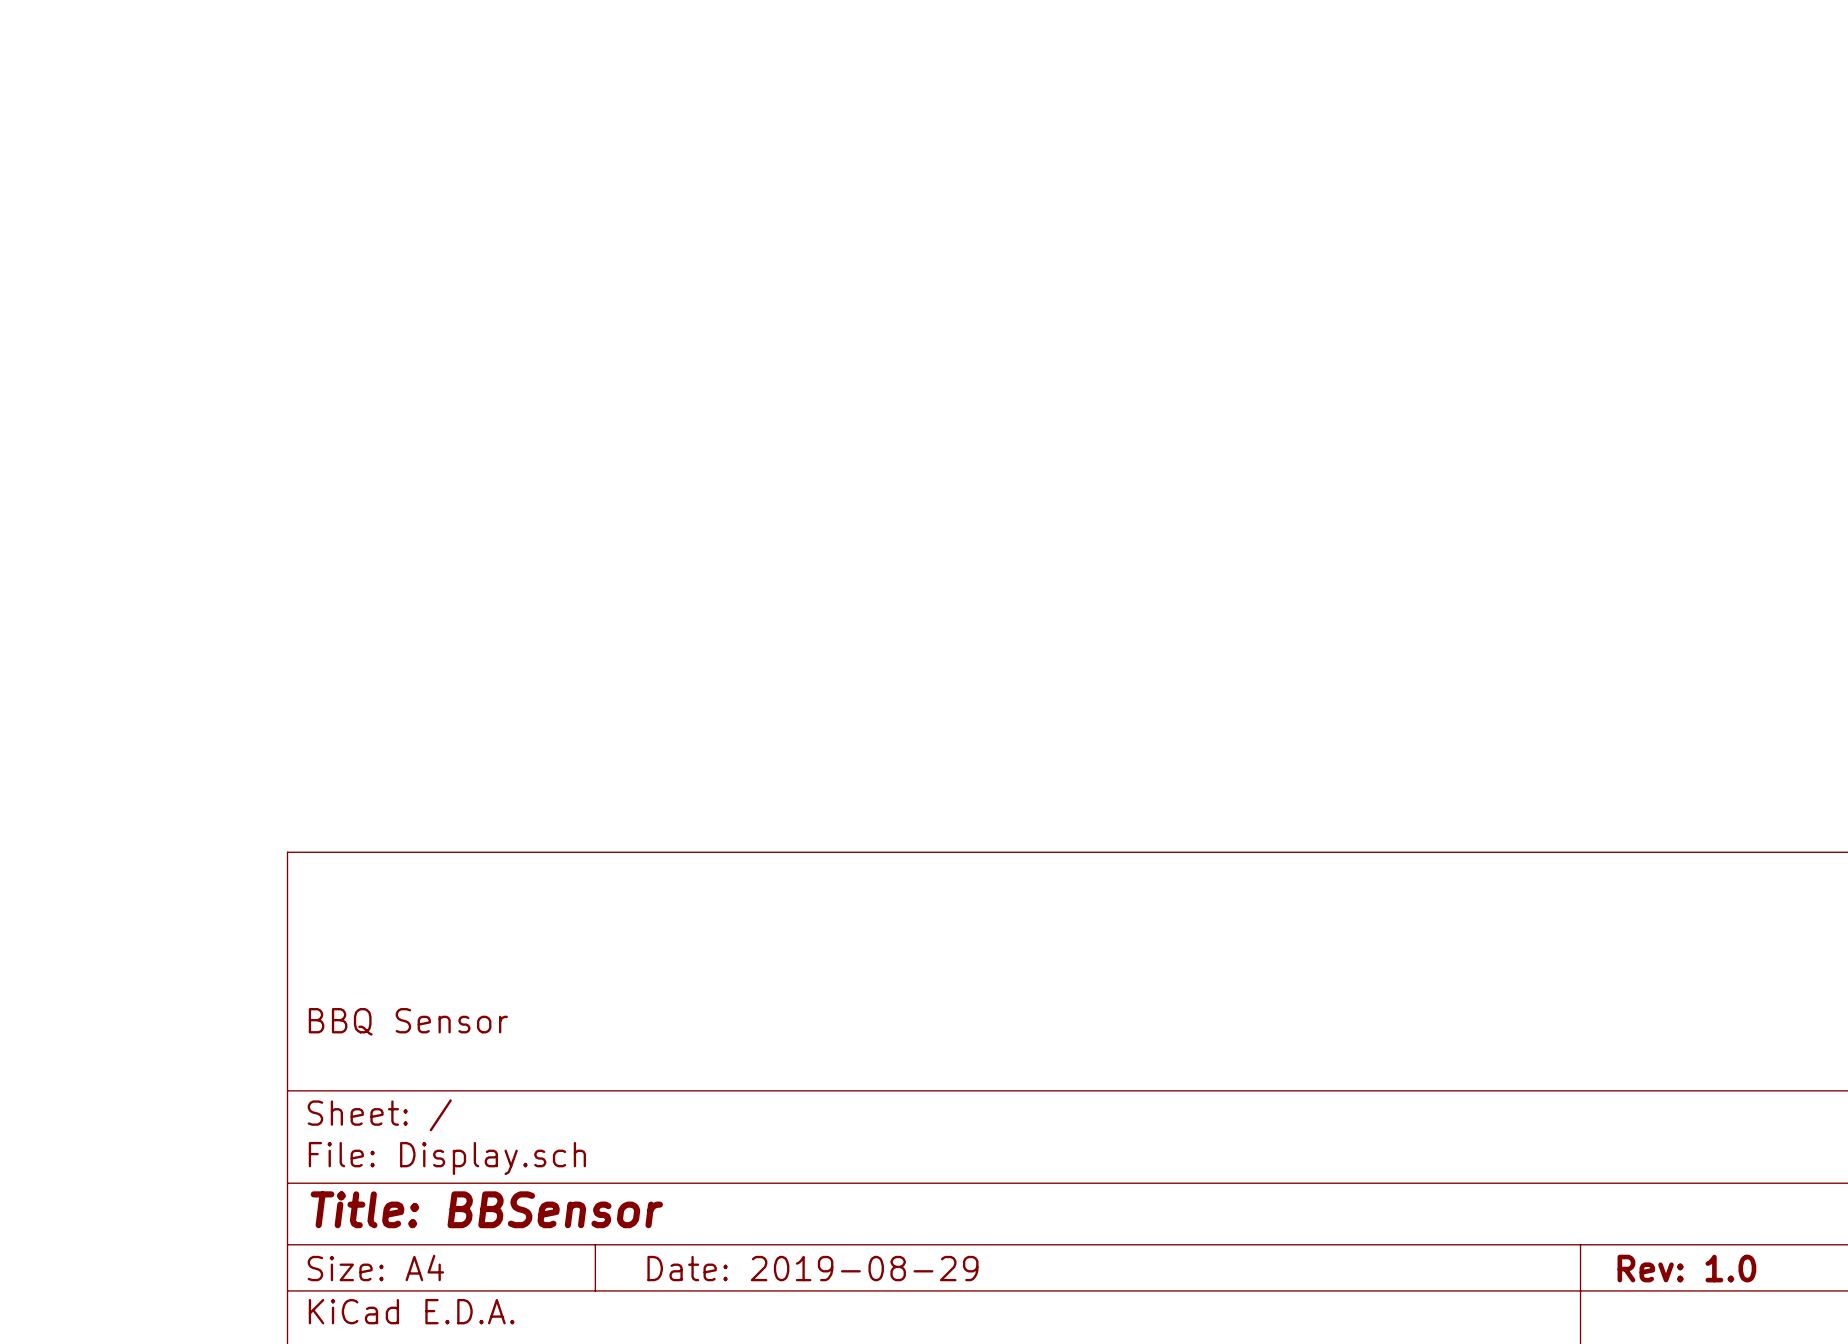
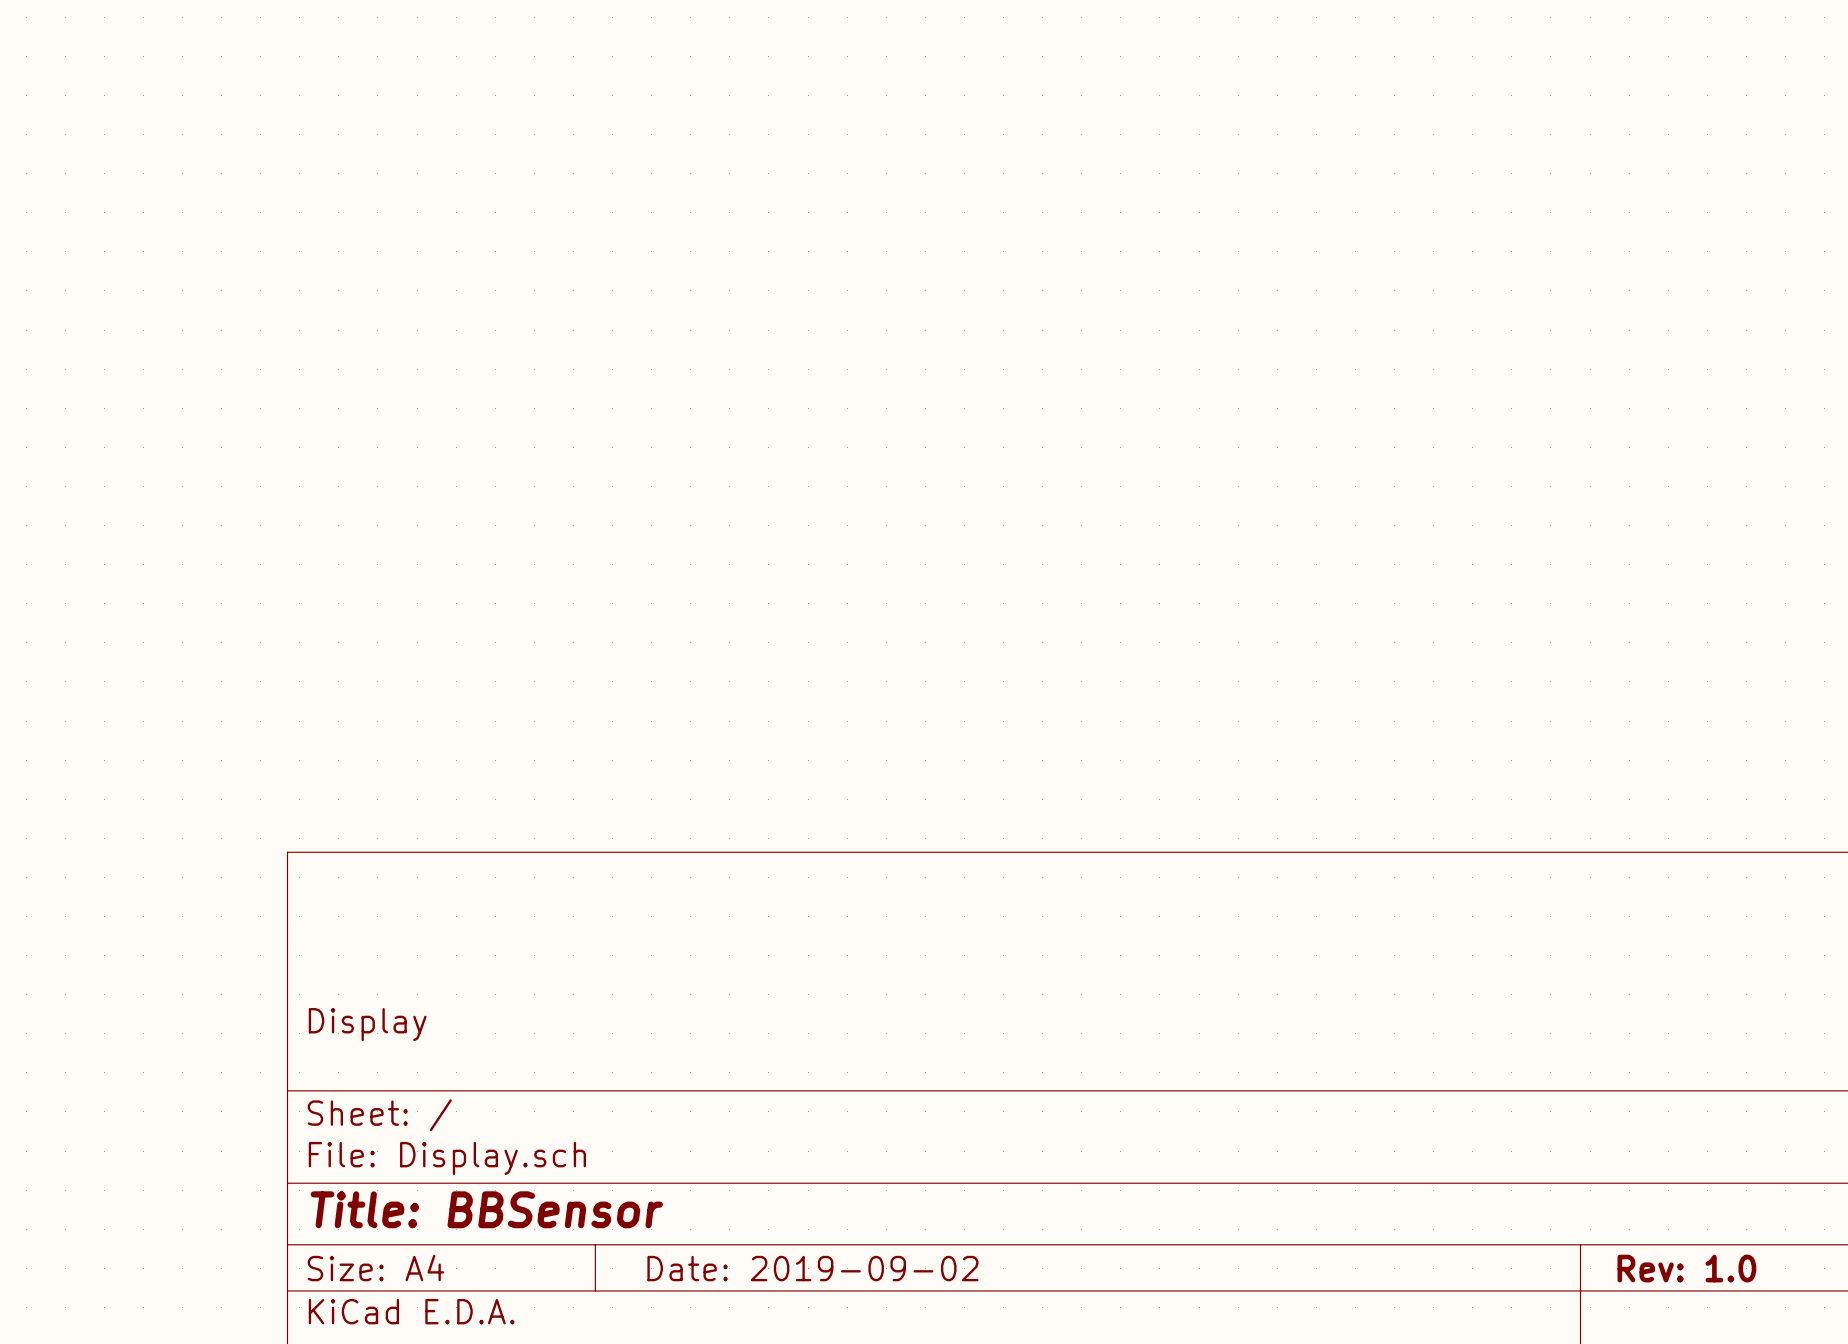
title block: BBQ Sensor (408, 1021) -> Display (367, 1024)
title block: Date: 2019-08-29 (812, 1268) -> Date: 2019-09-02 (812, 1268)

